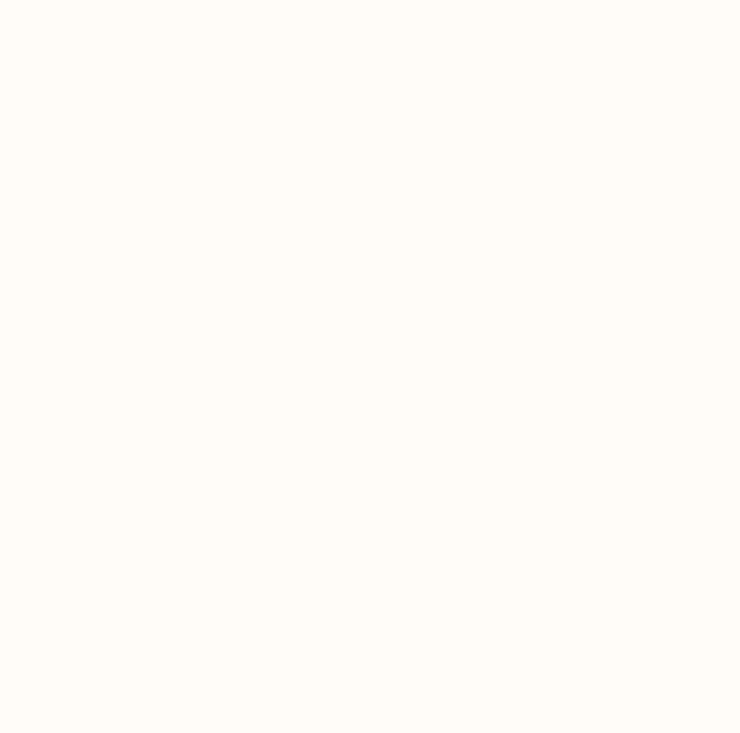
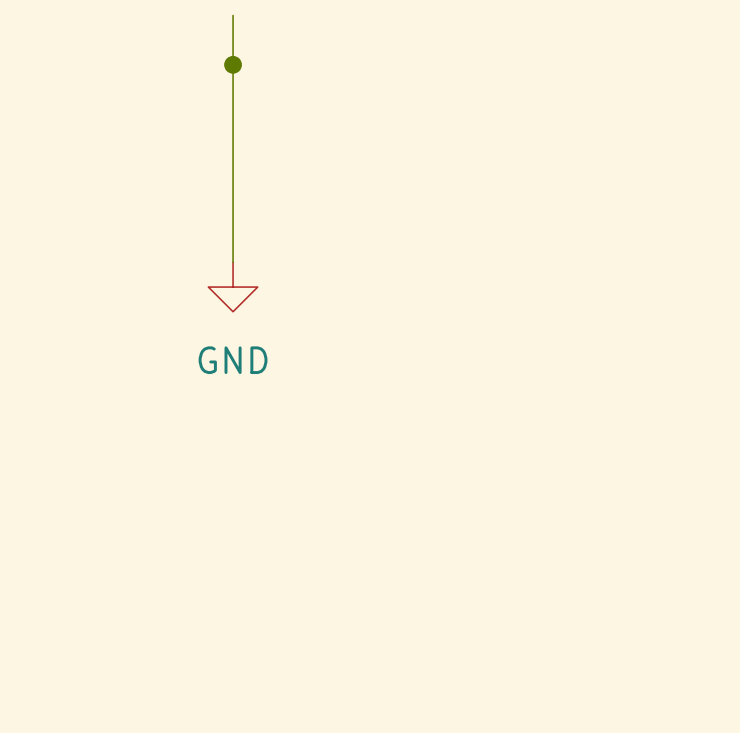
wire: none -> (233, 15) (233, 262)
junction: none -> (233, 64)
power symbol: none -> GND (233, 287)

